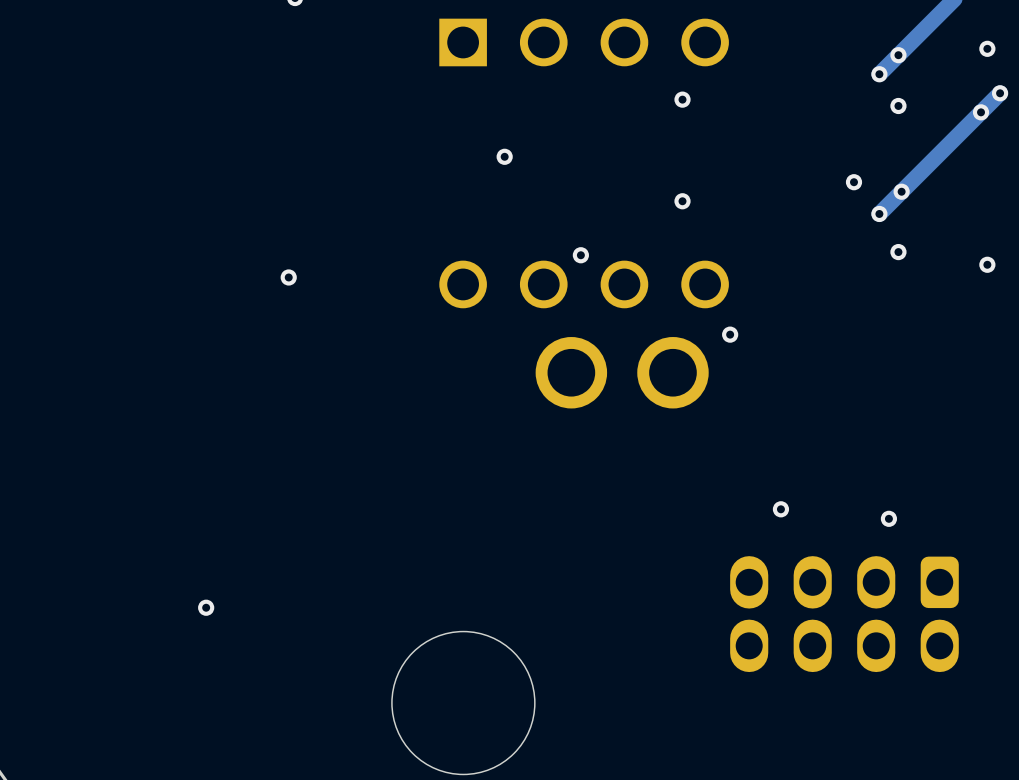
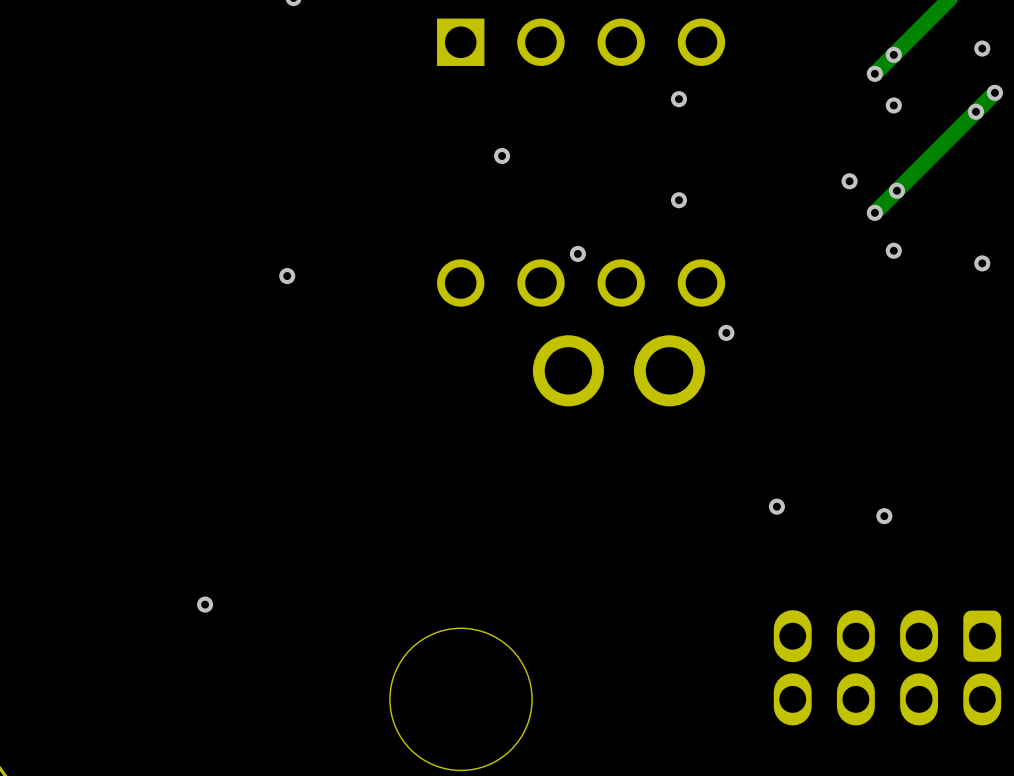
part position: (844, 614) -> (887, 667)

